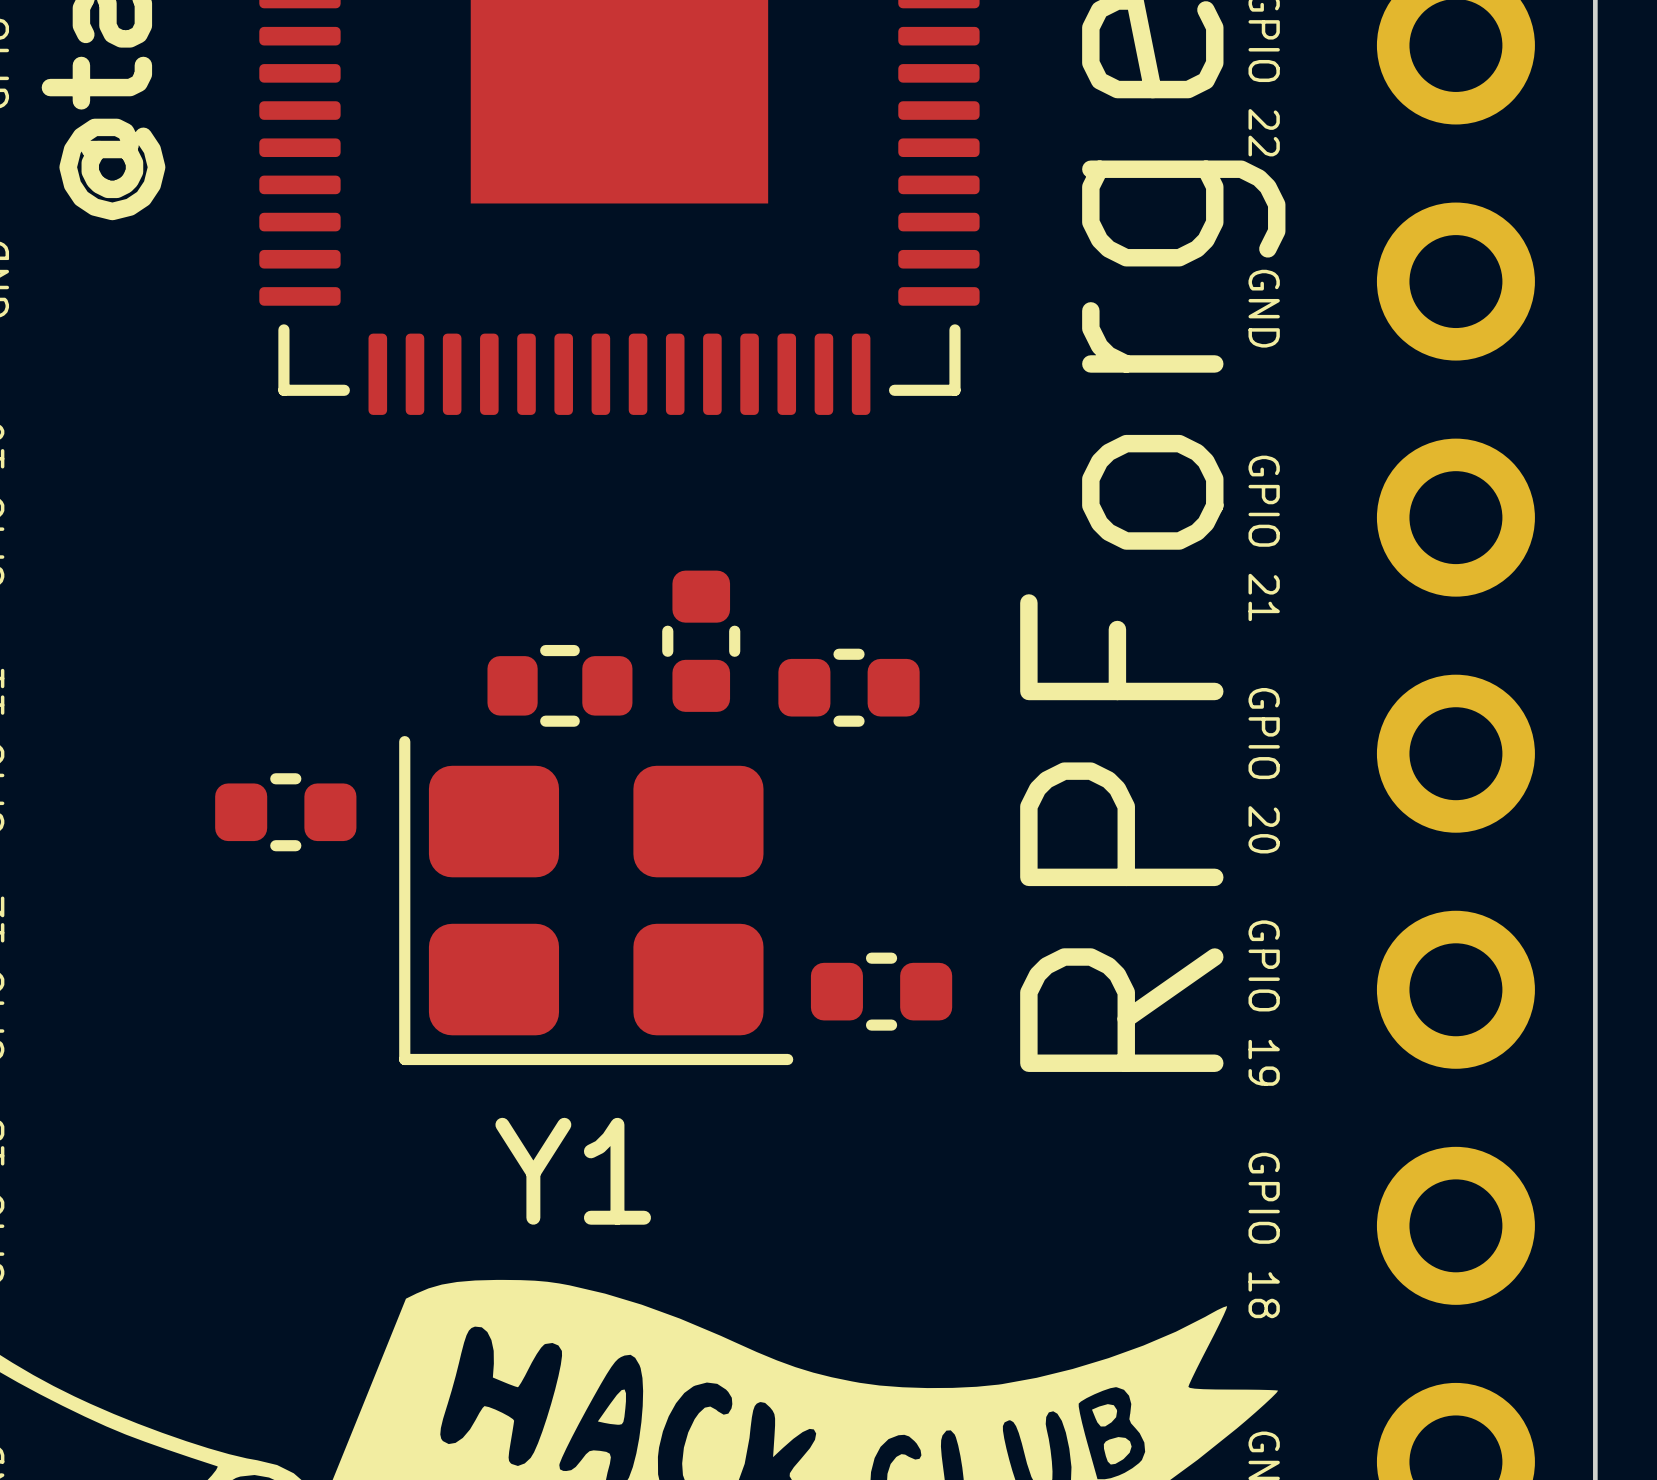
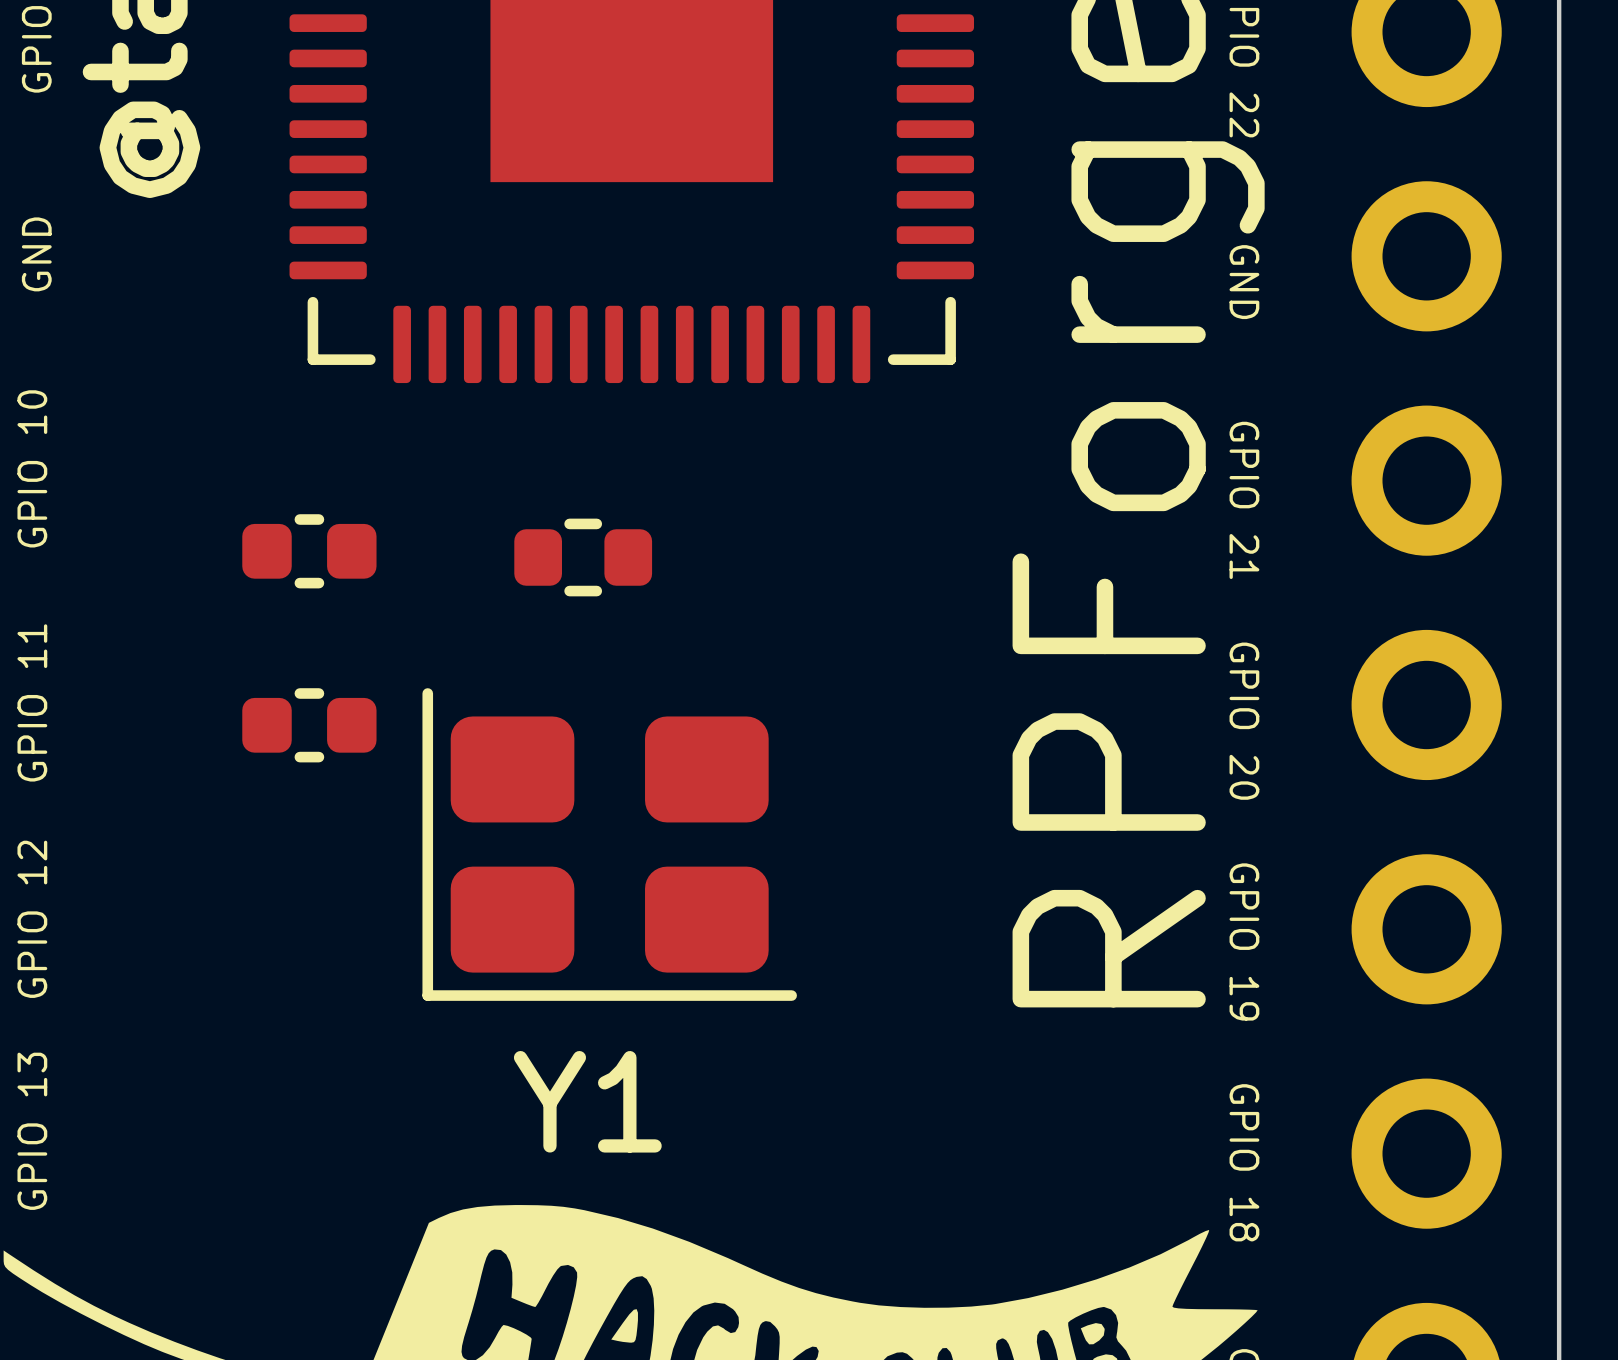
part: none -> (309, 551)
part: (701, 641) -> none
part position: (559, 685) -> (583, 557)
part: (849, 687) -> none
part position: (285, 812) -> (309, 725)
part: (881, 991) -> none

